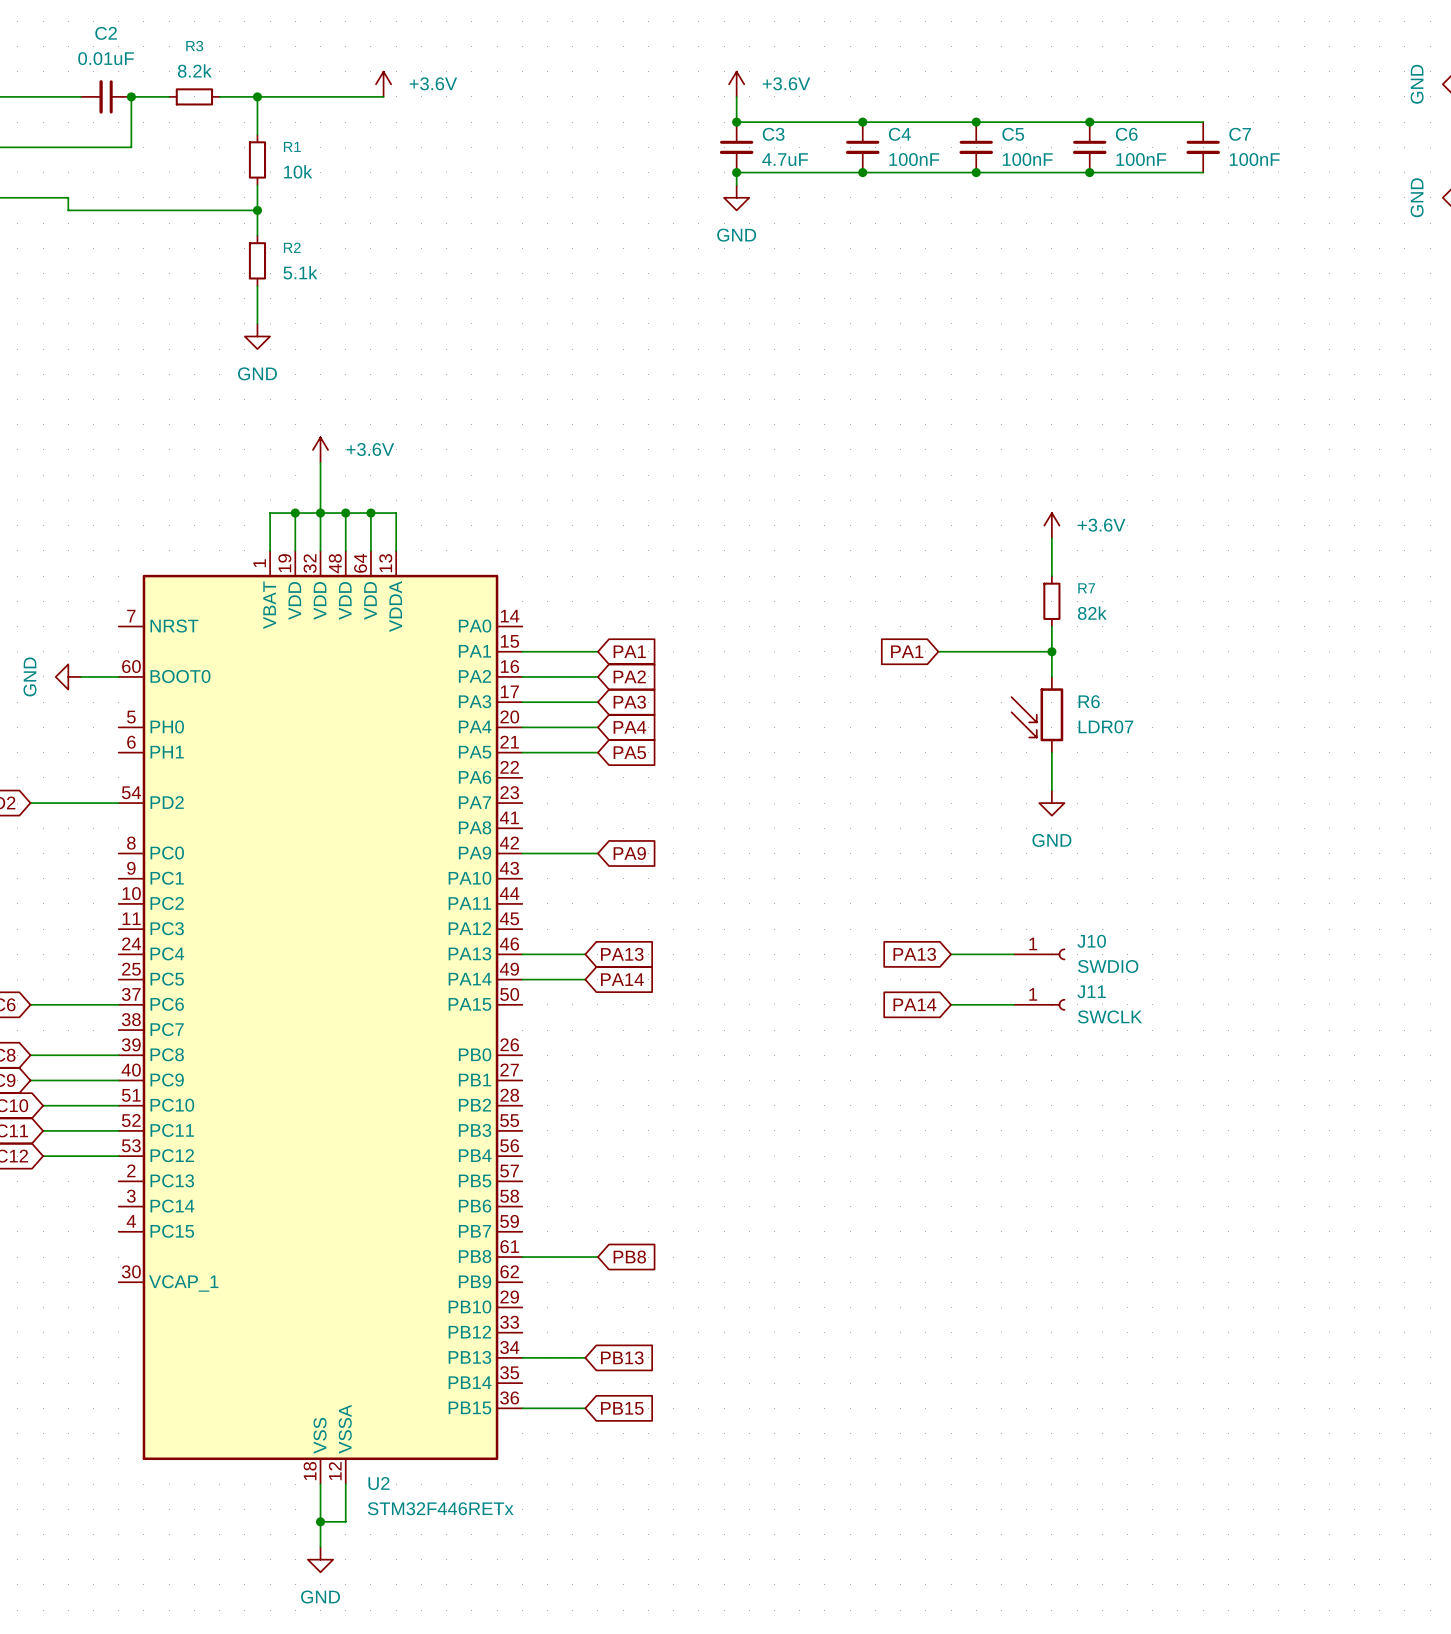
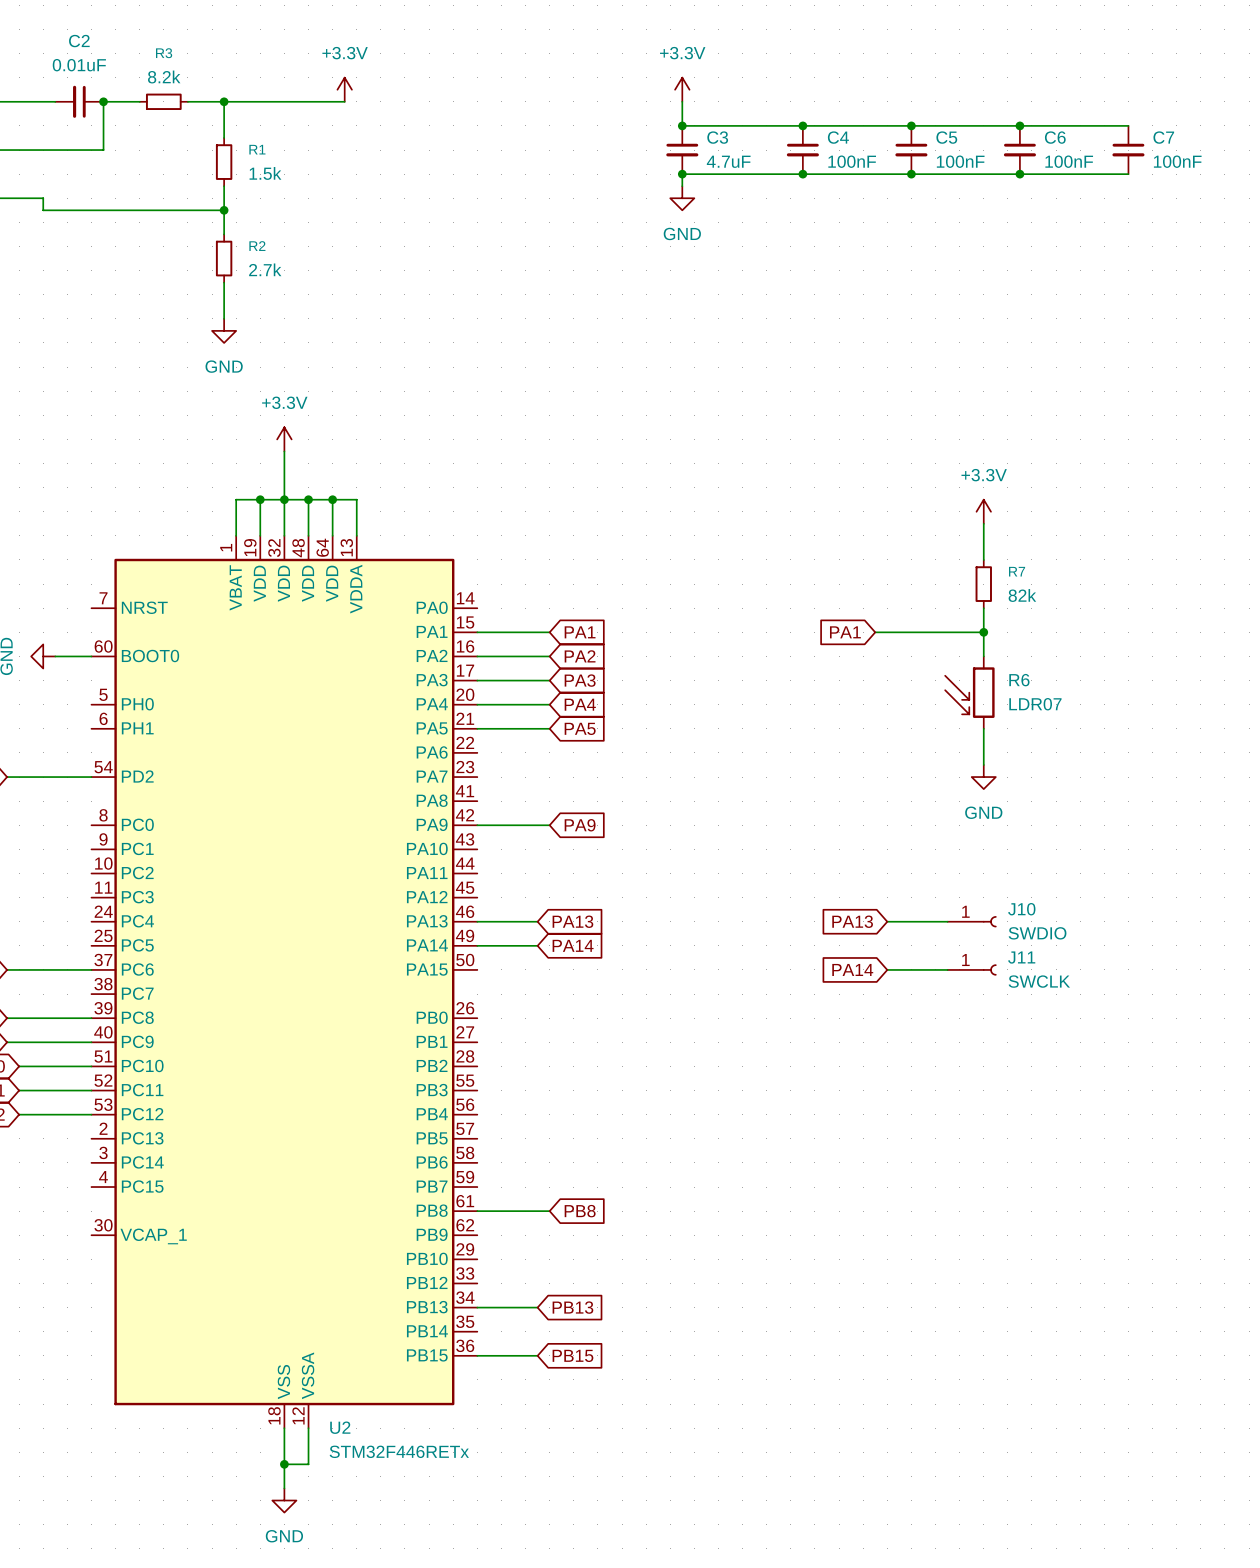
power symbol: +3.6V (383, 84) -> +3.3V (344, 89)
power symbol: +3.6V (736, 84) -> +3.3V (682, 89)
R1 value: 10k (298, 171) -> 1.5k (265, 173)
R2 value: 5.1k (300, 272) -> 2.7k (265, 269)
power symbol: +3.6V (320, 449) -> +3.3V (284, 439)
power symbol: +3.6V (1051, 525) -> +3.3V (983, 511)

